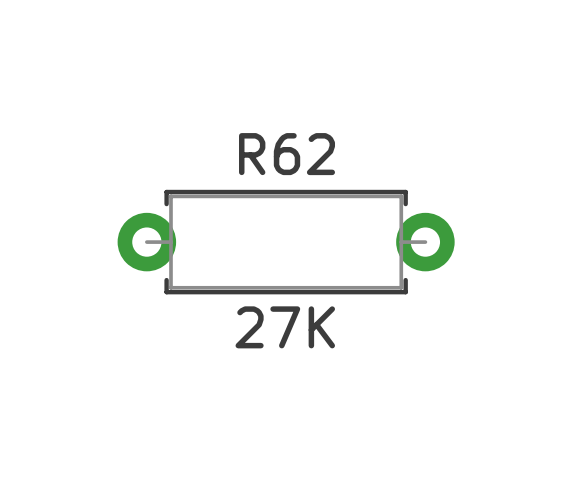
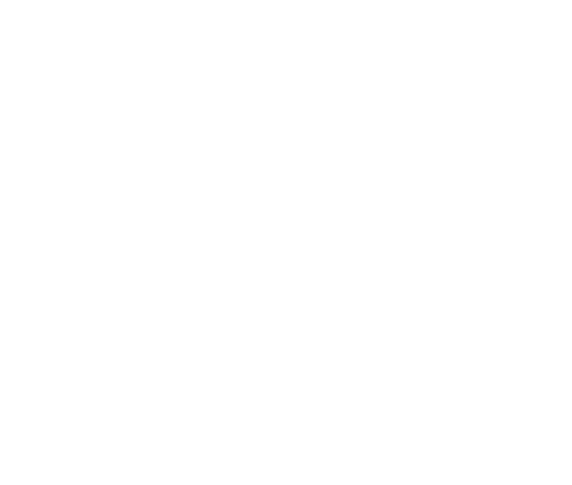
R62: 27K (286, 242) -> none

